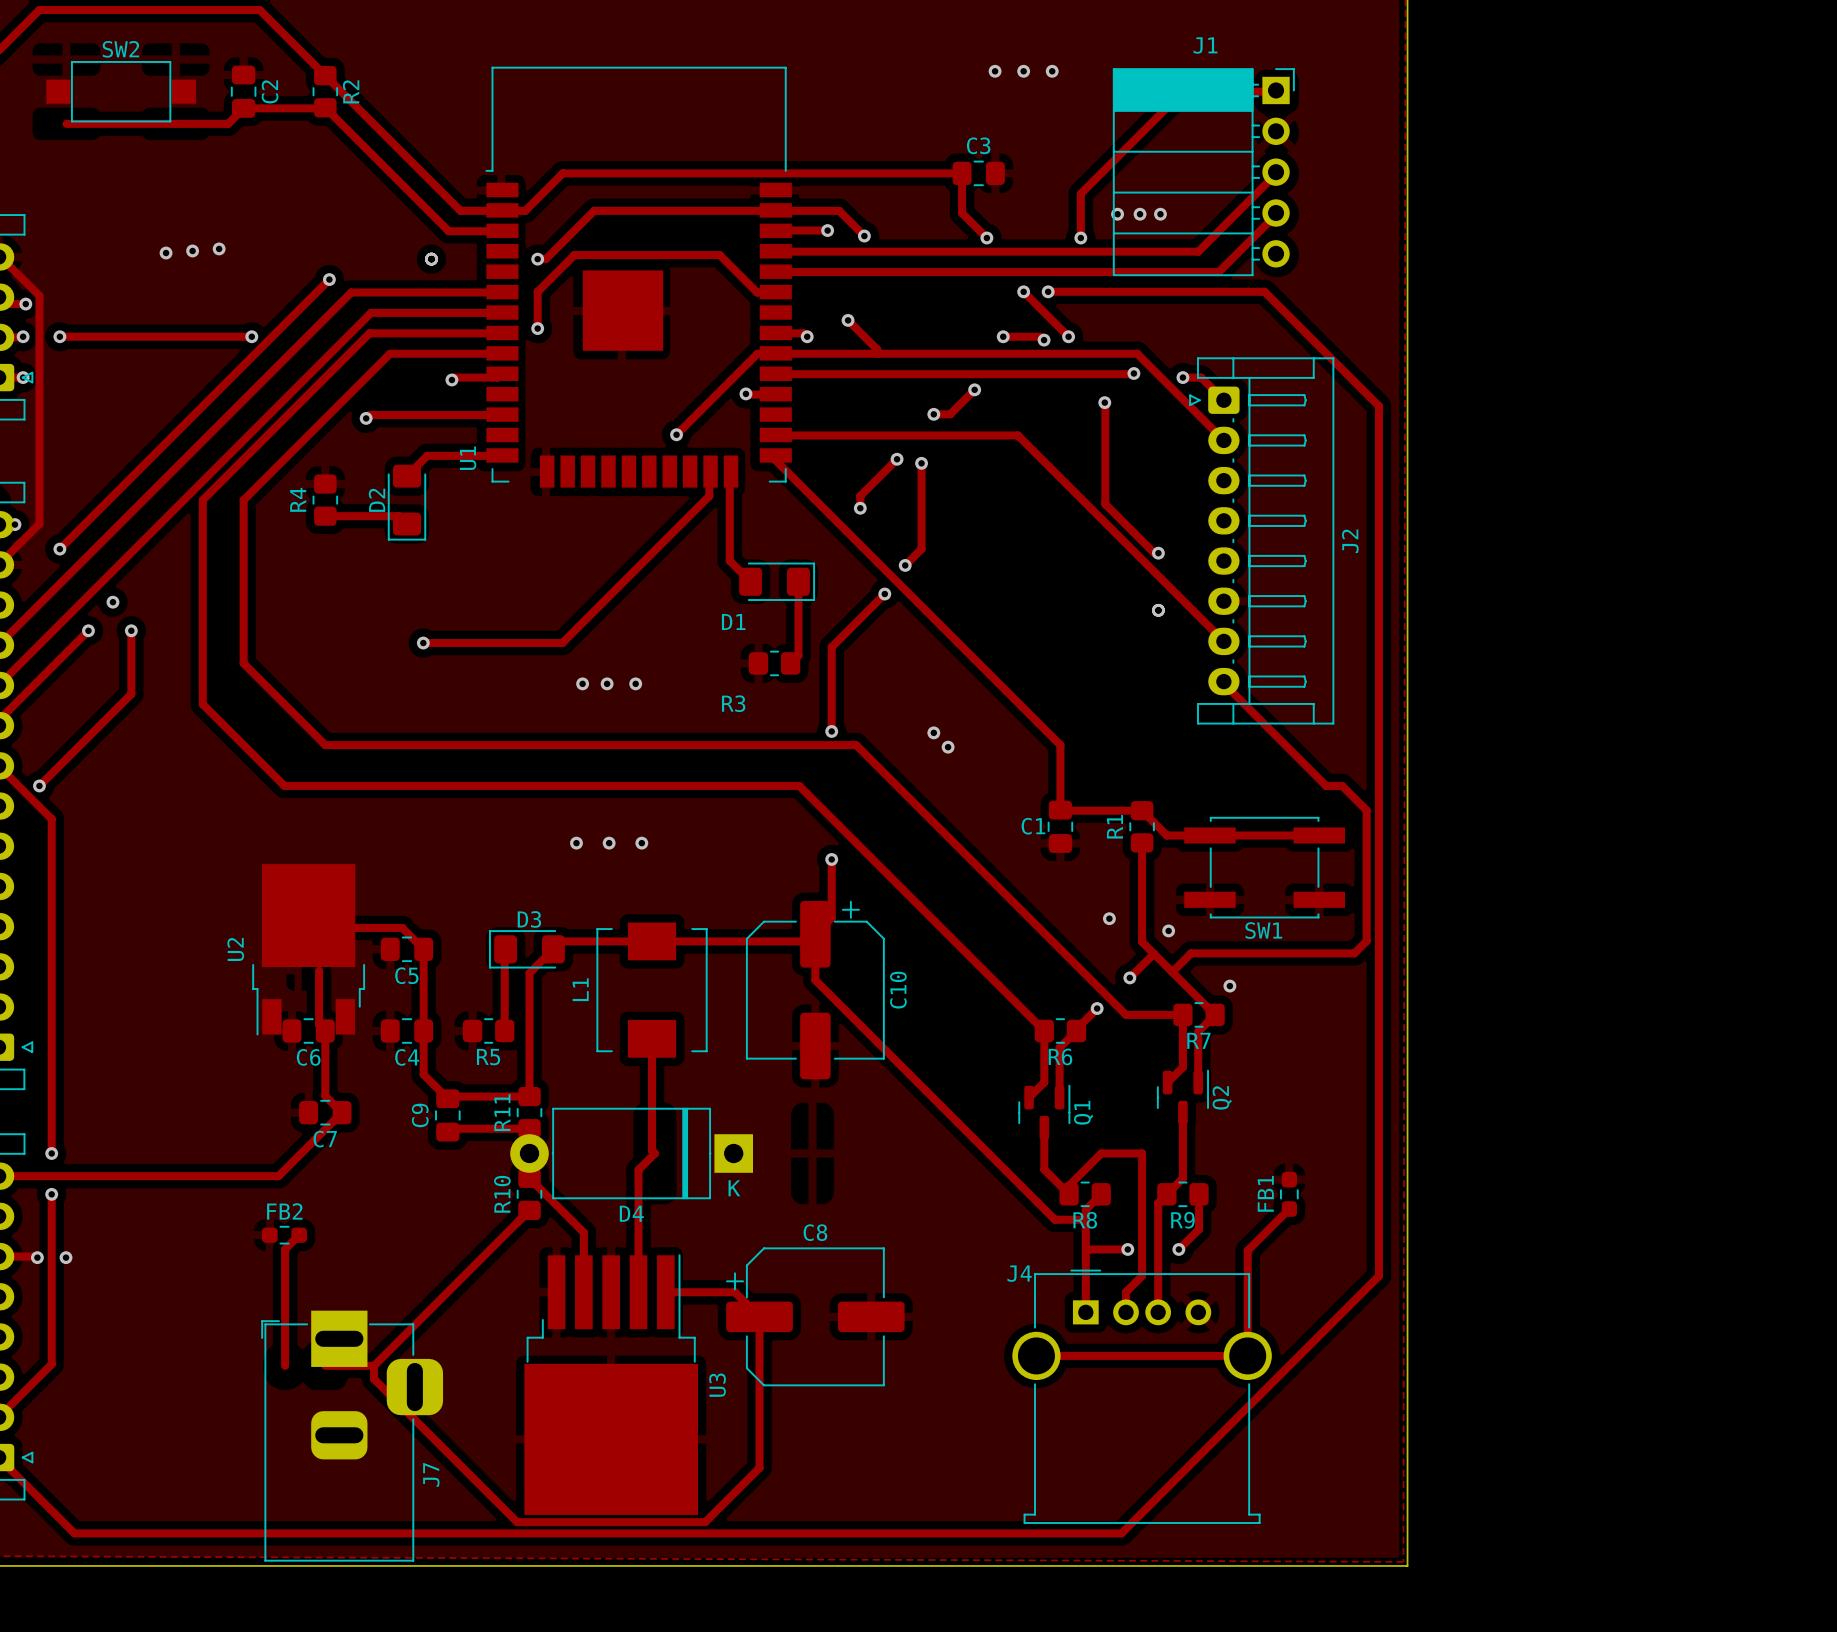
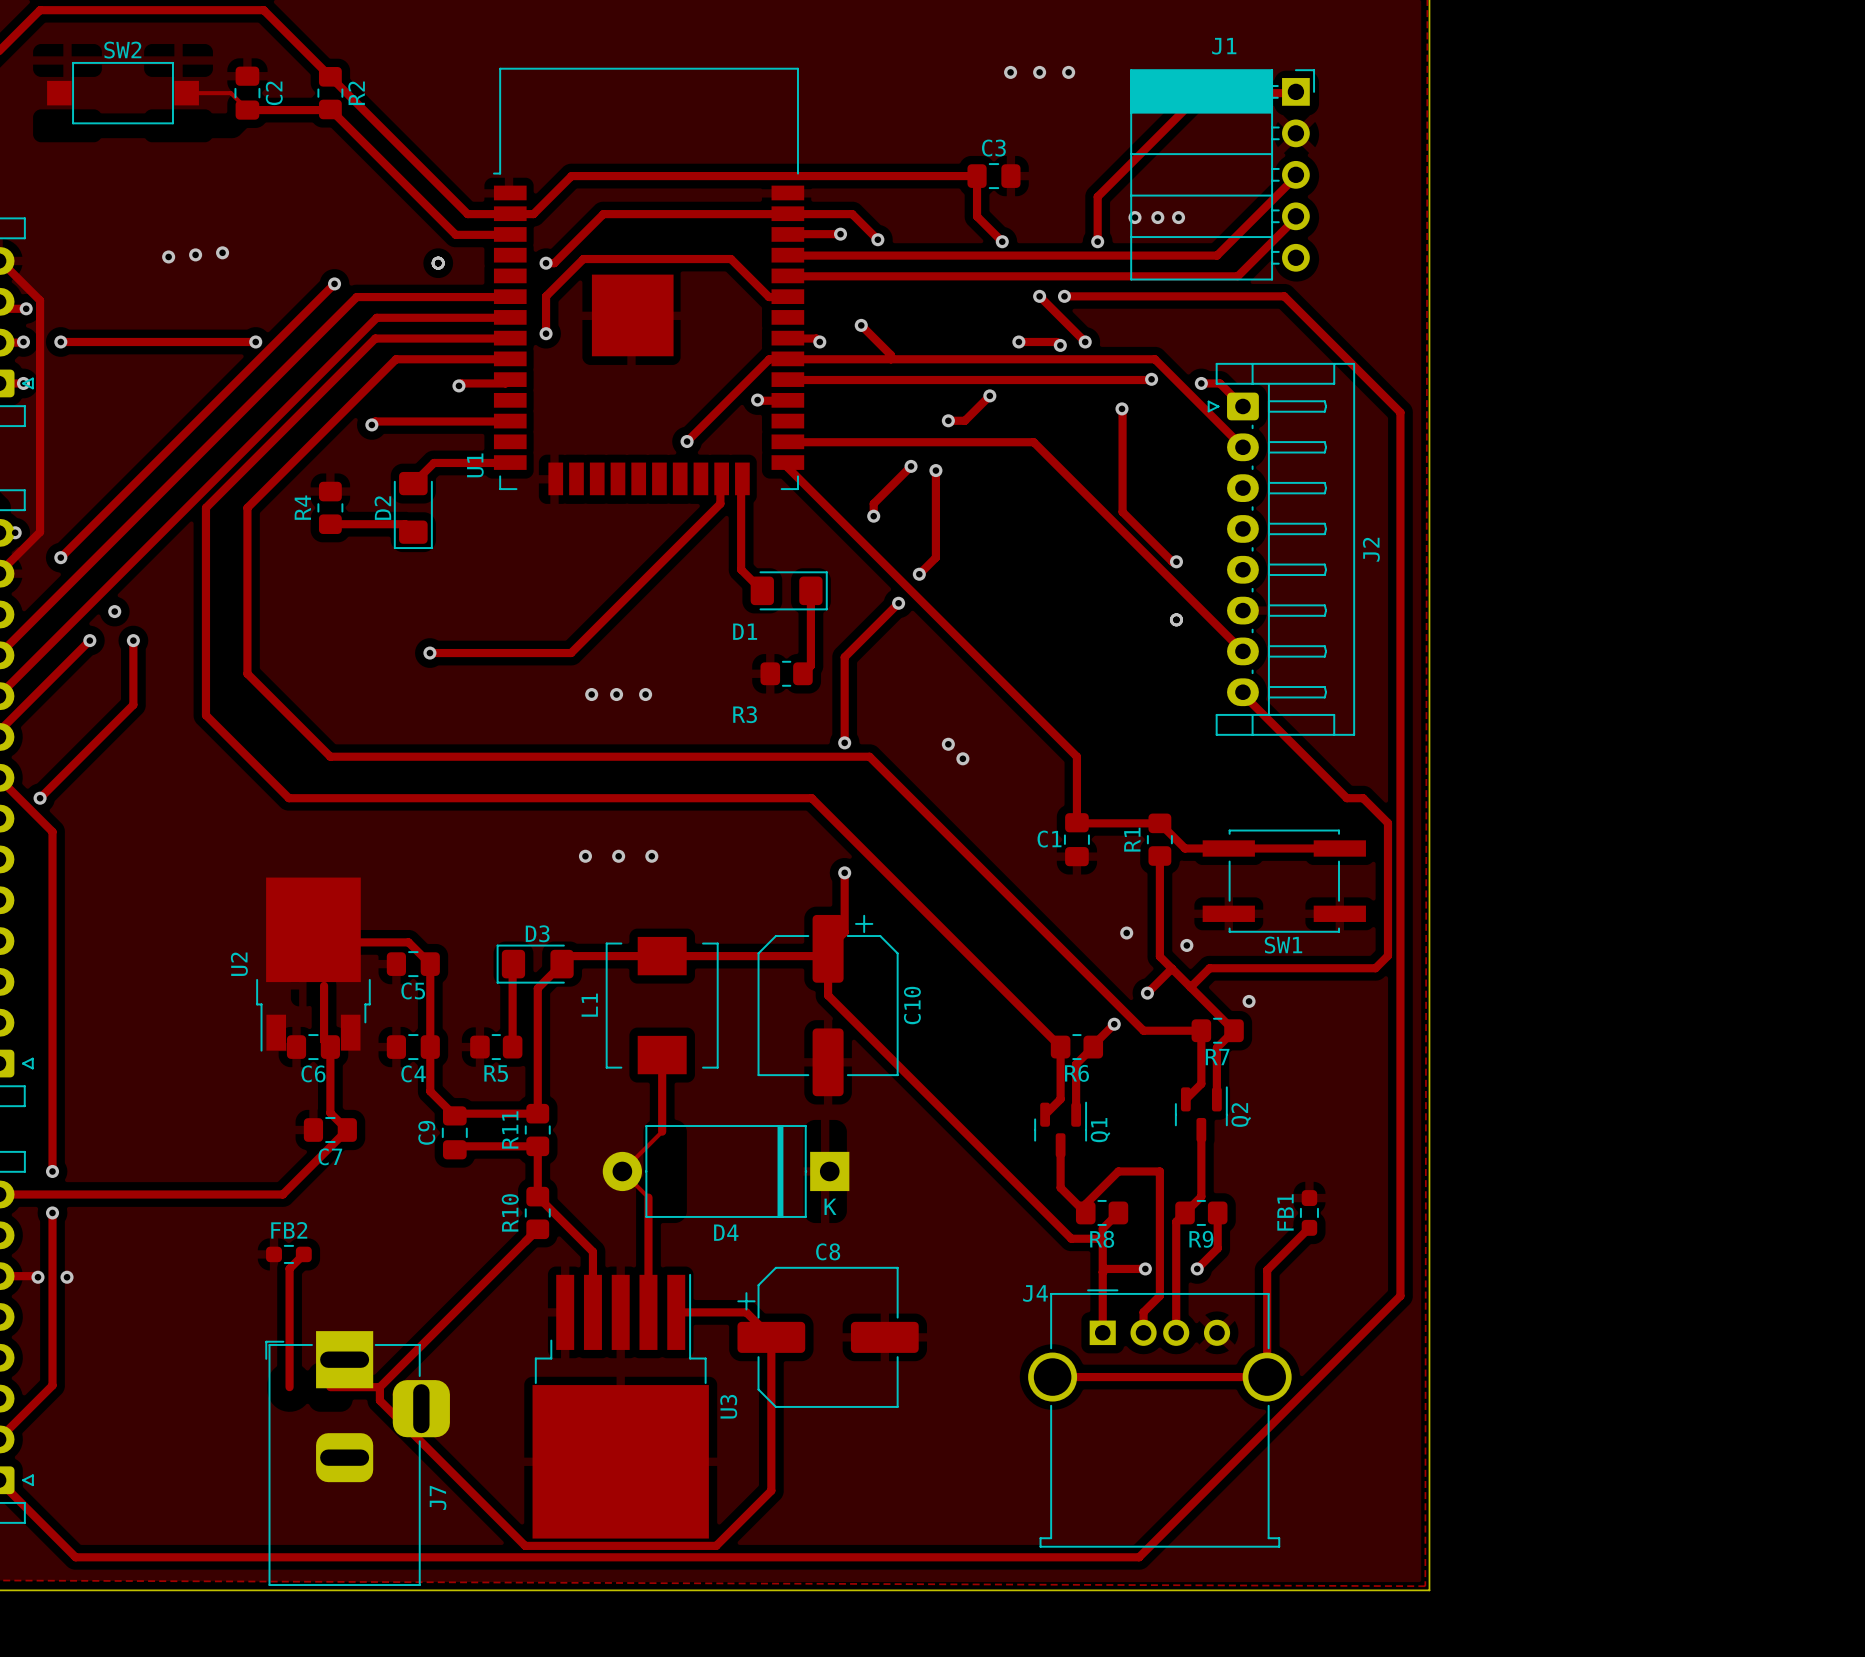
track: (244, 108) (228, 123) (66, 123) -> (247, 110) (230, 93) (187, 93)
track: (652, 1114) (652, 1150) (654, 1153) (638, 1169) (638, 1179) -> (662, 1131) (622, 1171) (648, 1197)
D4 position: (631, 1153) -> (726, 1171)

